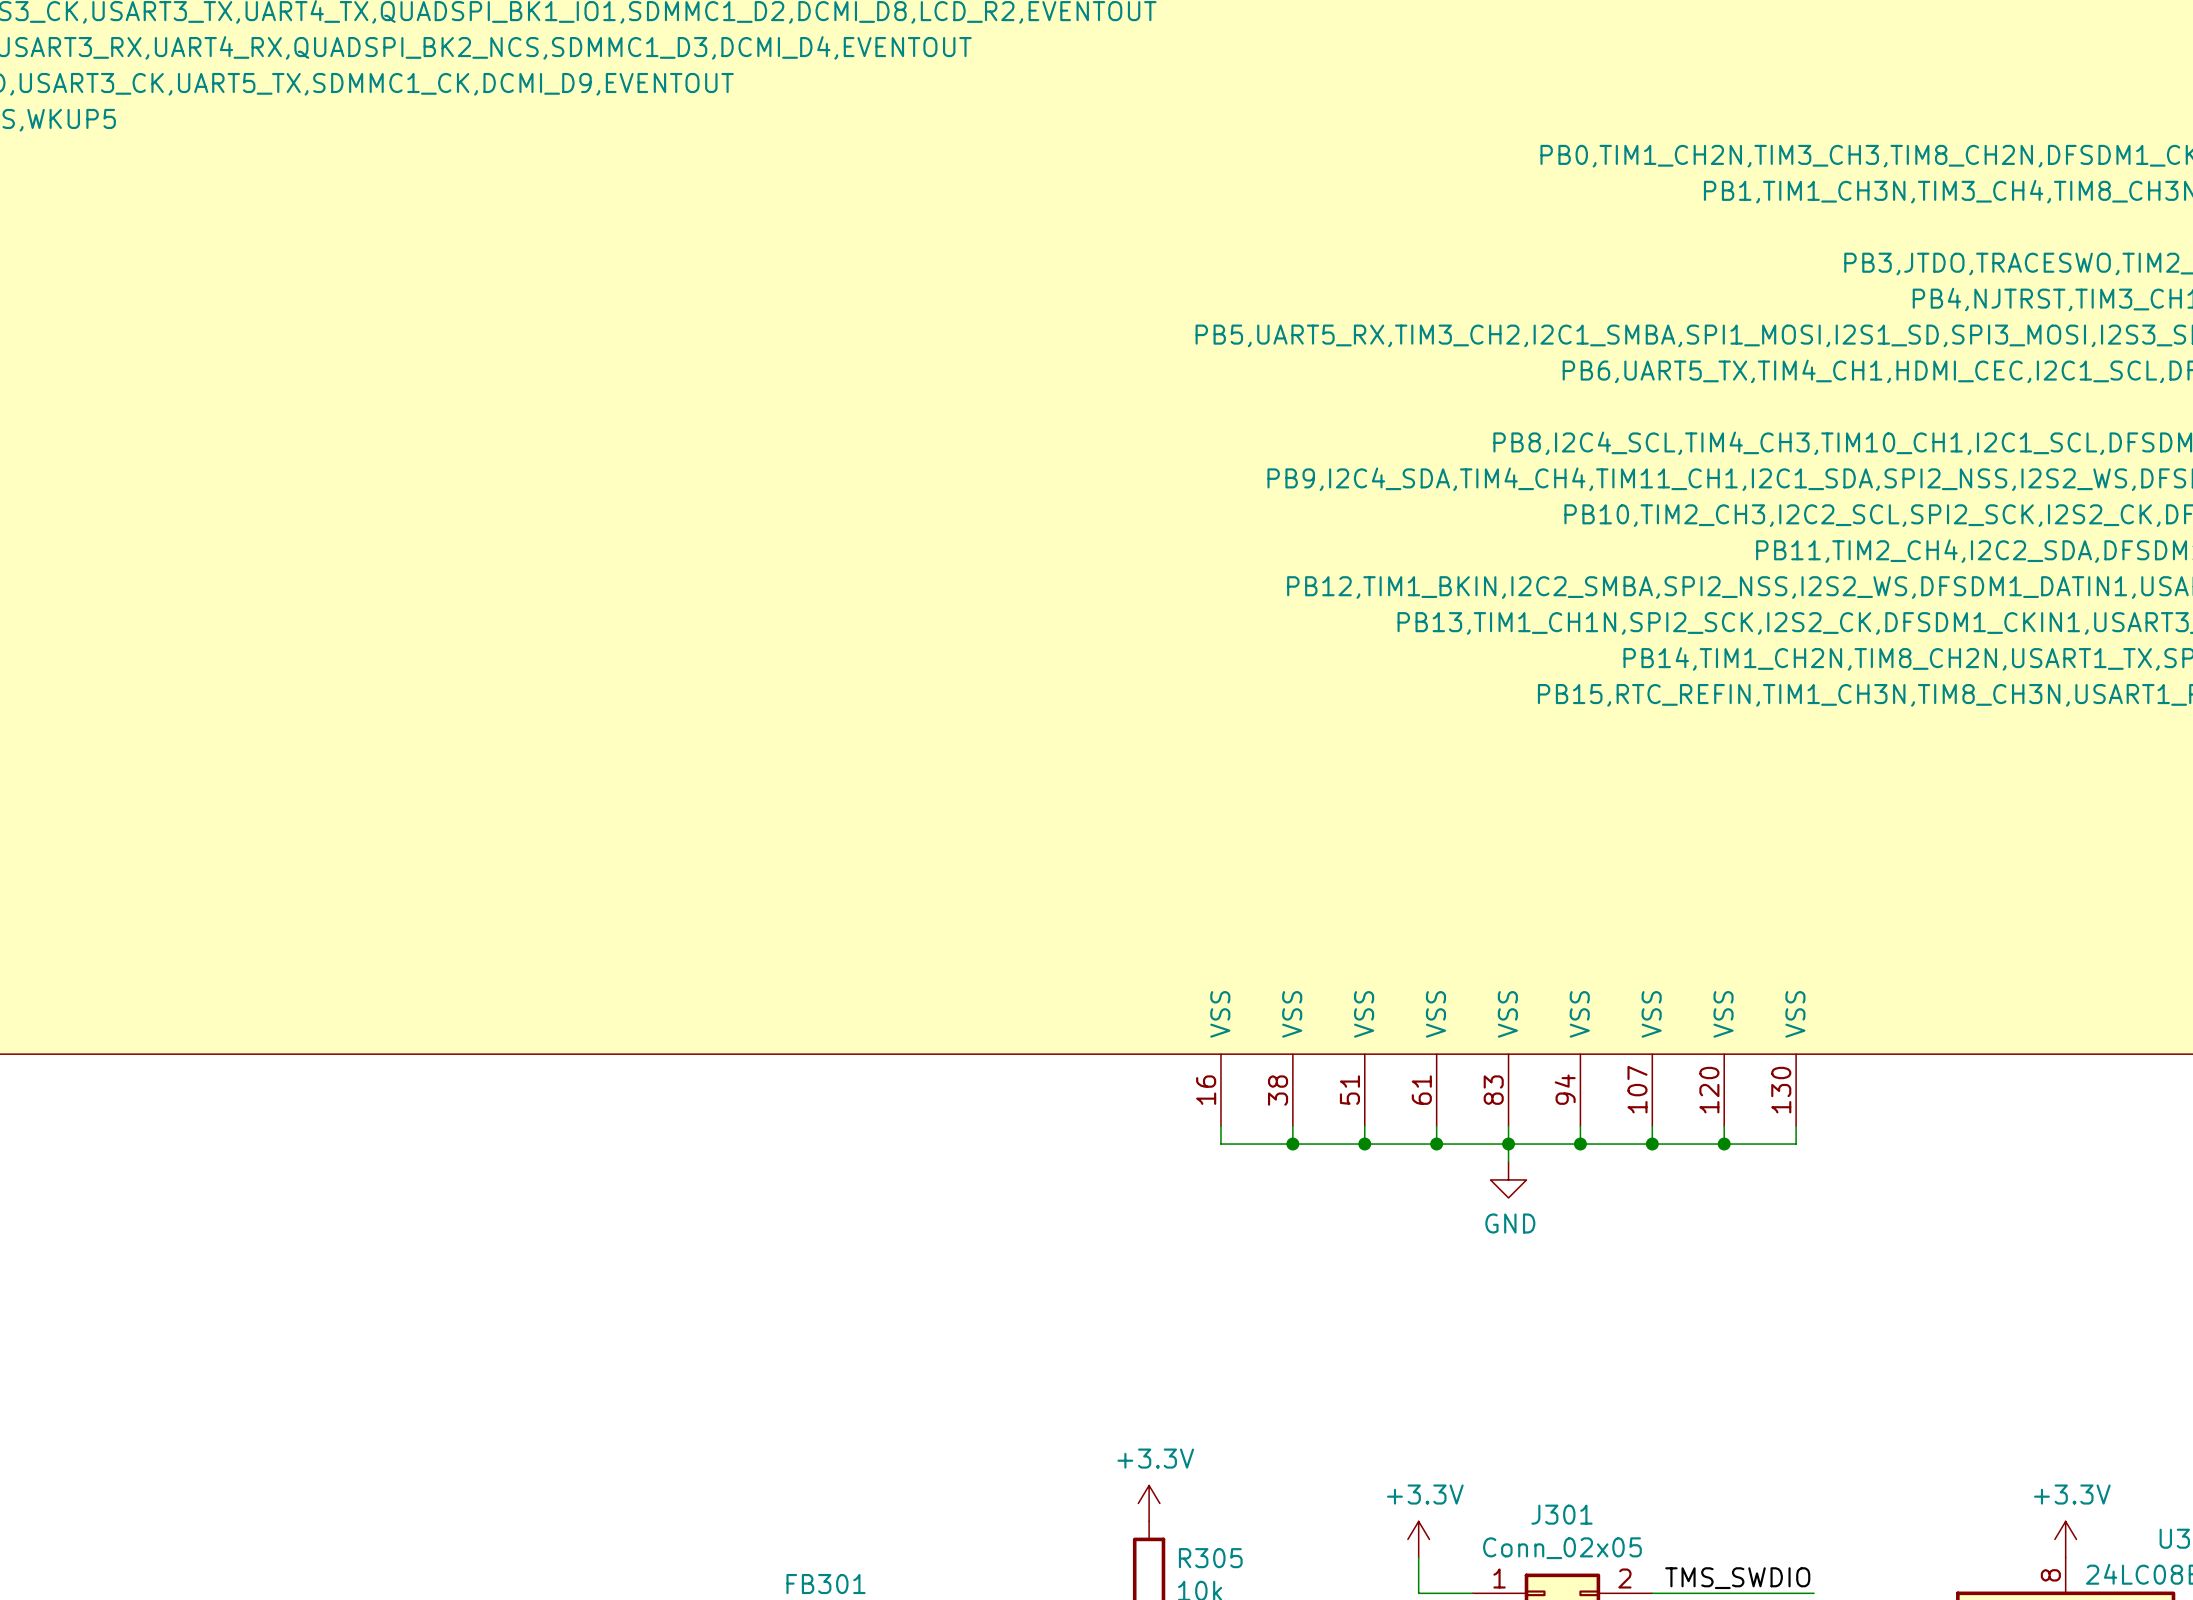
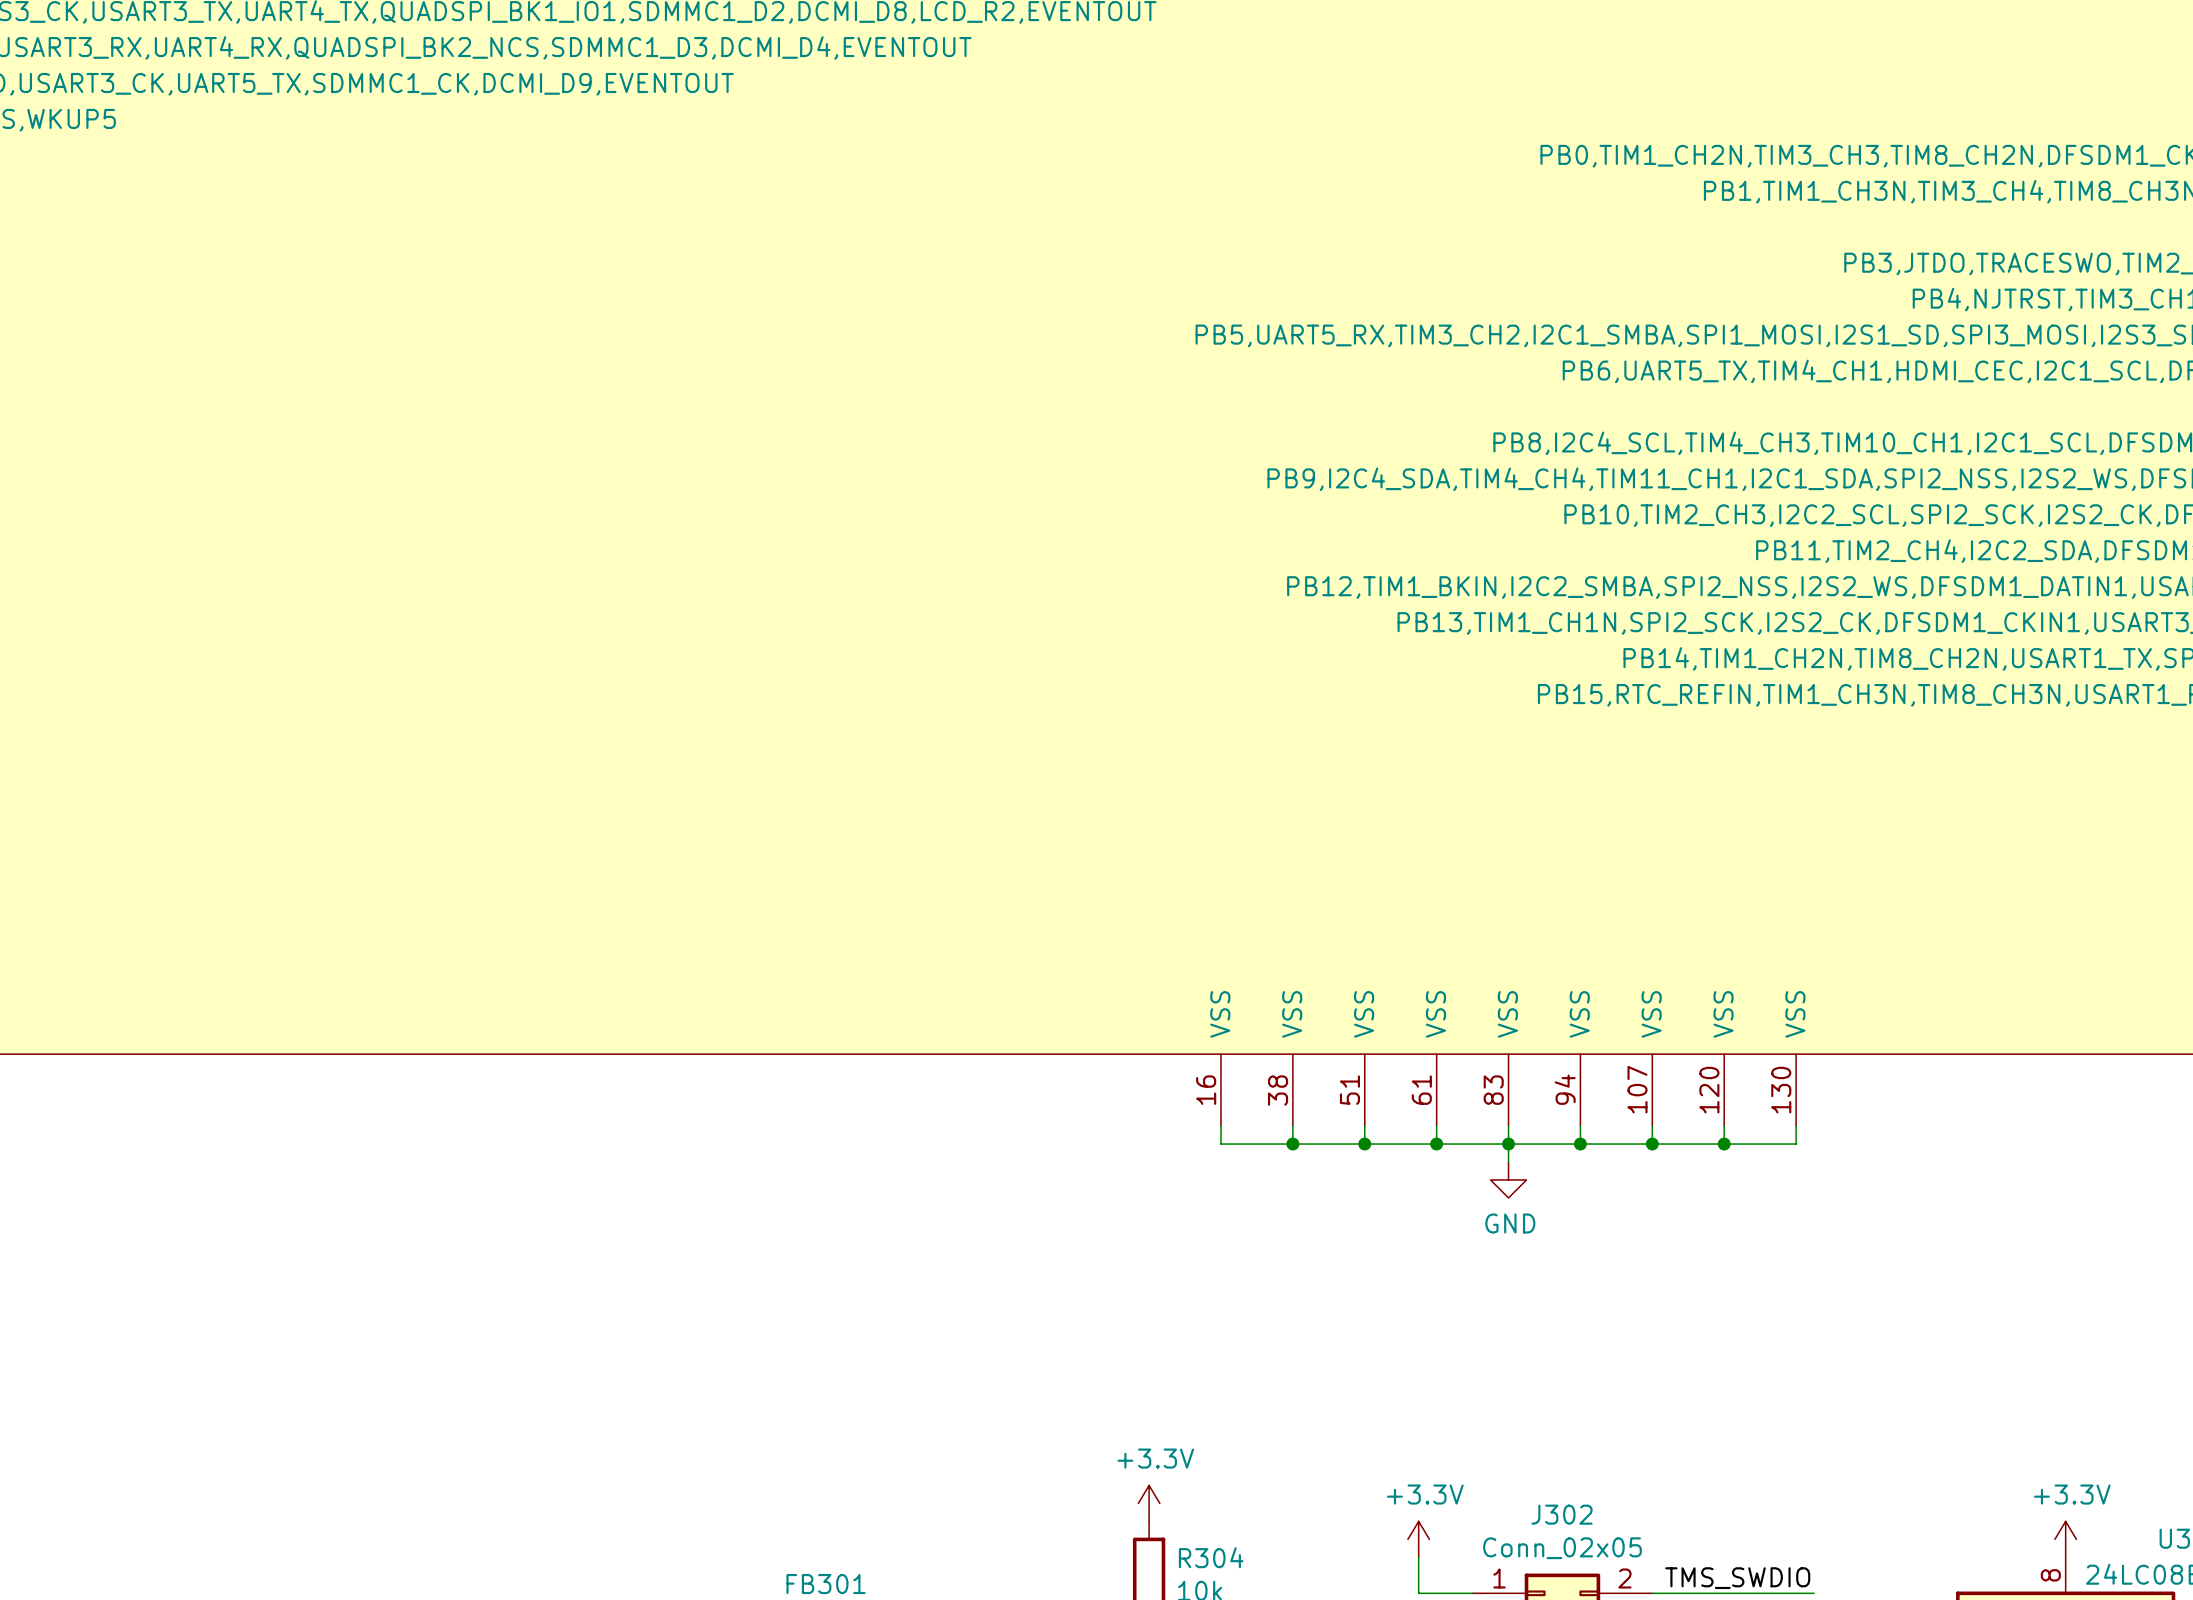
J301 name: J301 (1562, 1514) -> J302 (1562, 1514)
R305 name: R305 (1210, 1558) -> R304 (1211, 1557)

